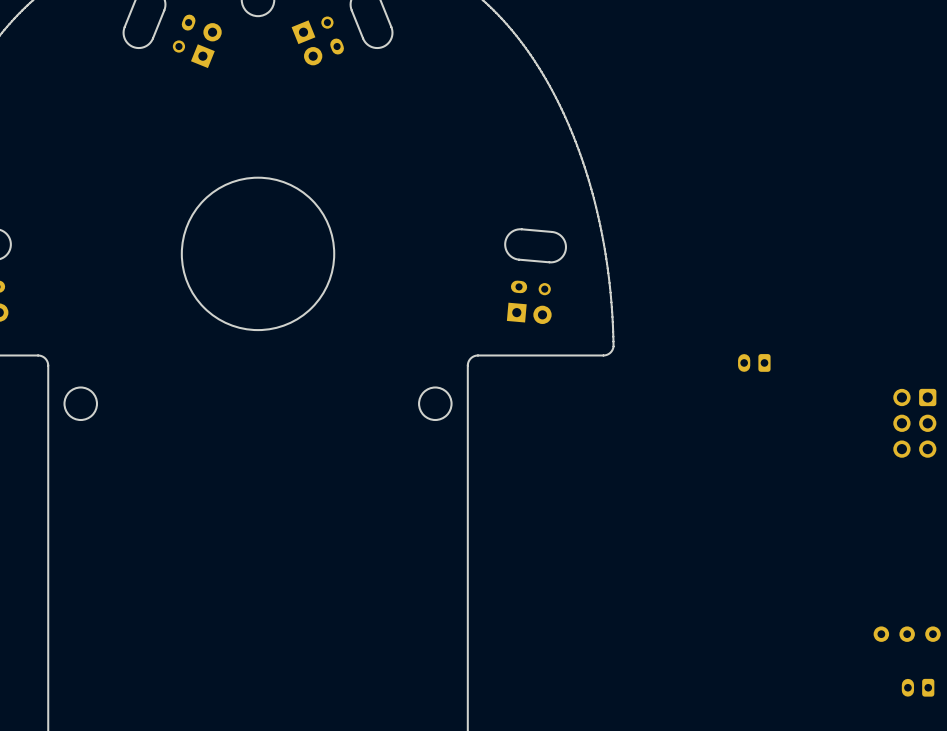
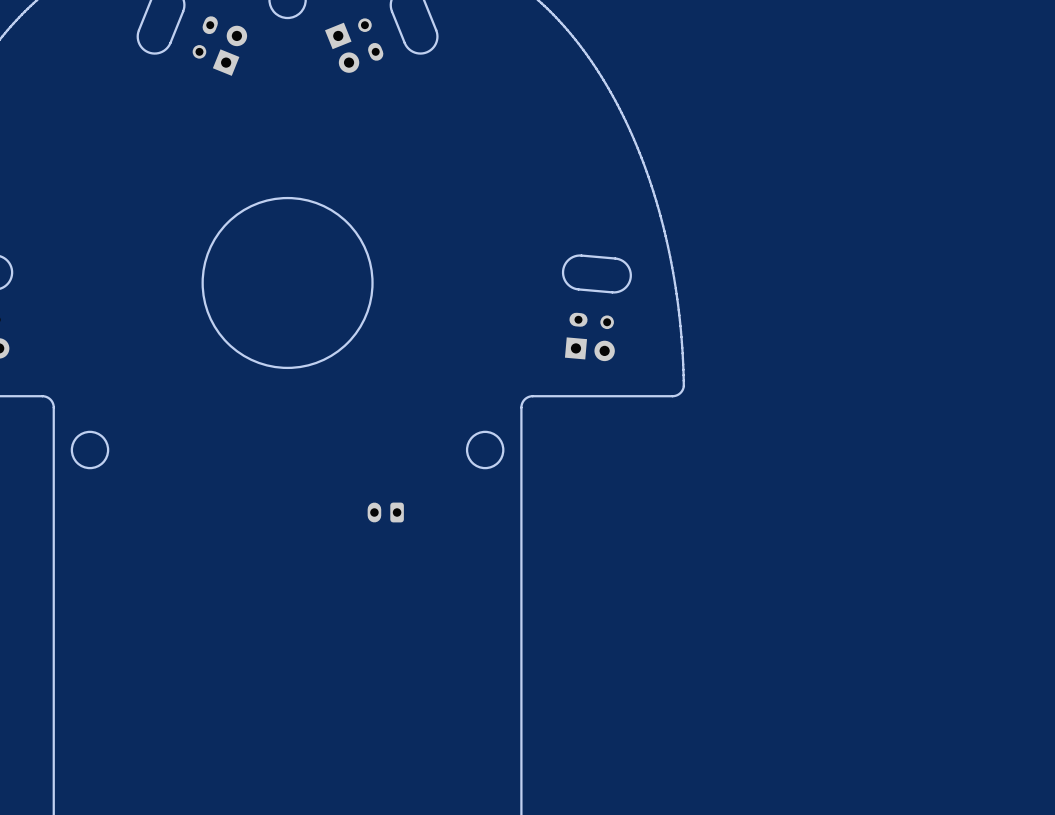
part: (754, 362) -> none
part: (914, 423) -> none
part: none -> (385, 512)
part: (907, 634) -> none
part: (918, 687) -> none

